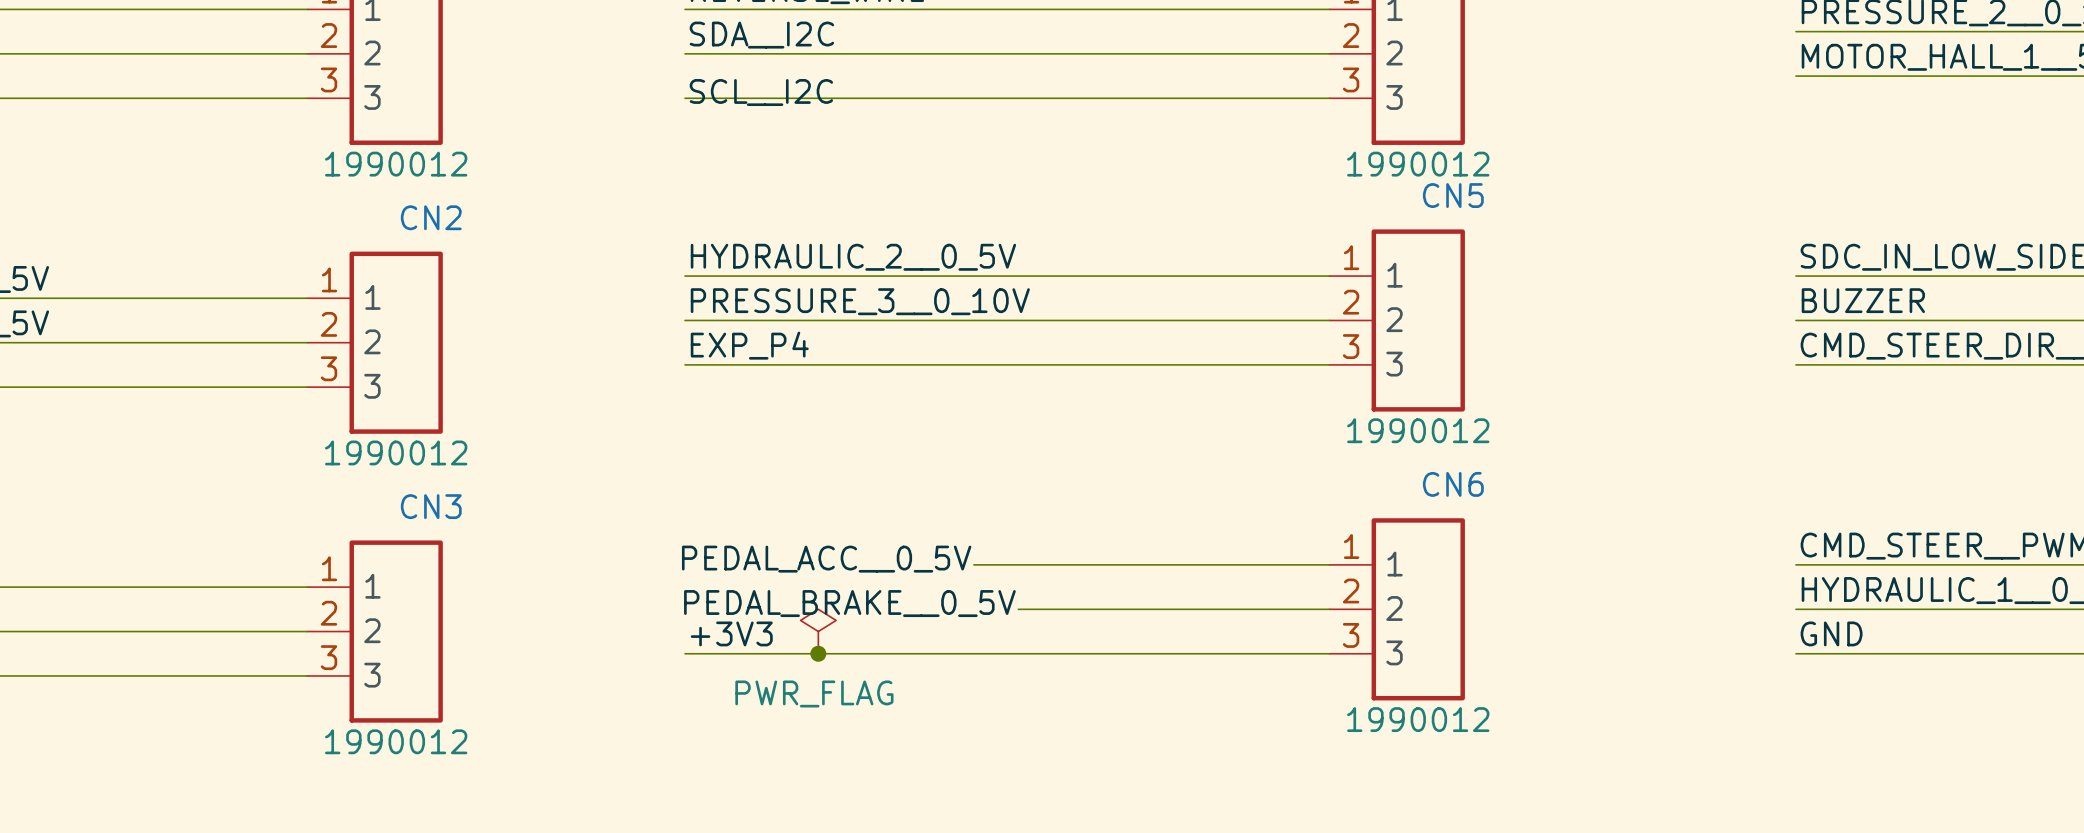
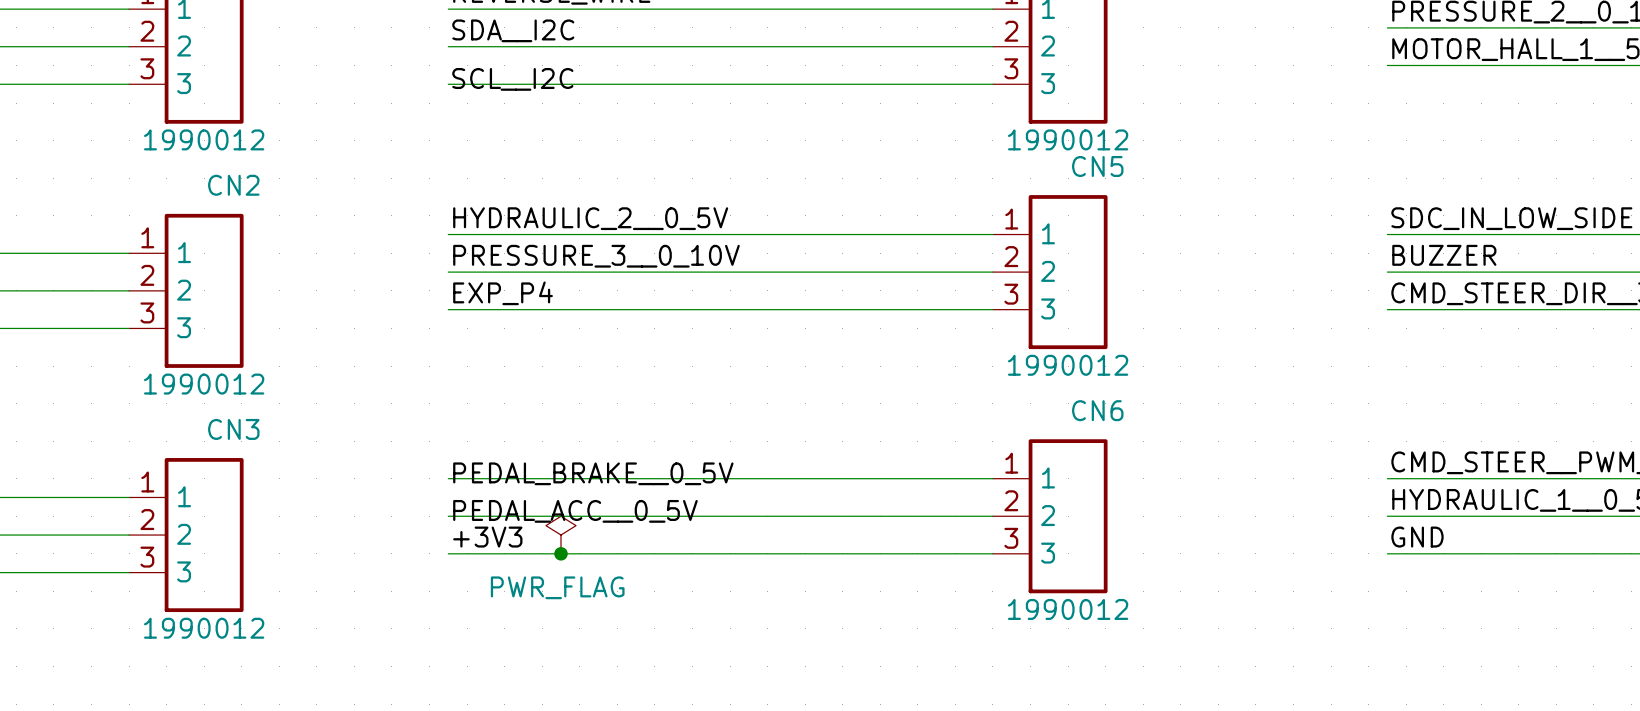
label position: PEDAL_ACC__0_5V (826, 559) -> PEDAL_ACC__0_5V (575, 511)
wire: none -> (448, 478) (692, 478)
label position: PEDAL_BRAKE__0_5V (849, 603) -> PEDAL_BRAKE__0_5V (593, 473)
wire: none -> (448, 516) (730, 516)

